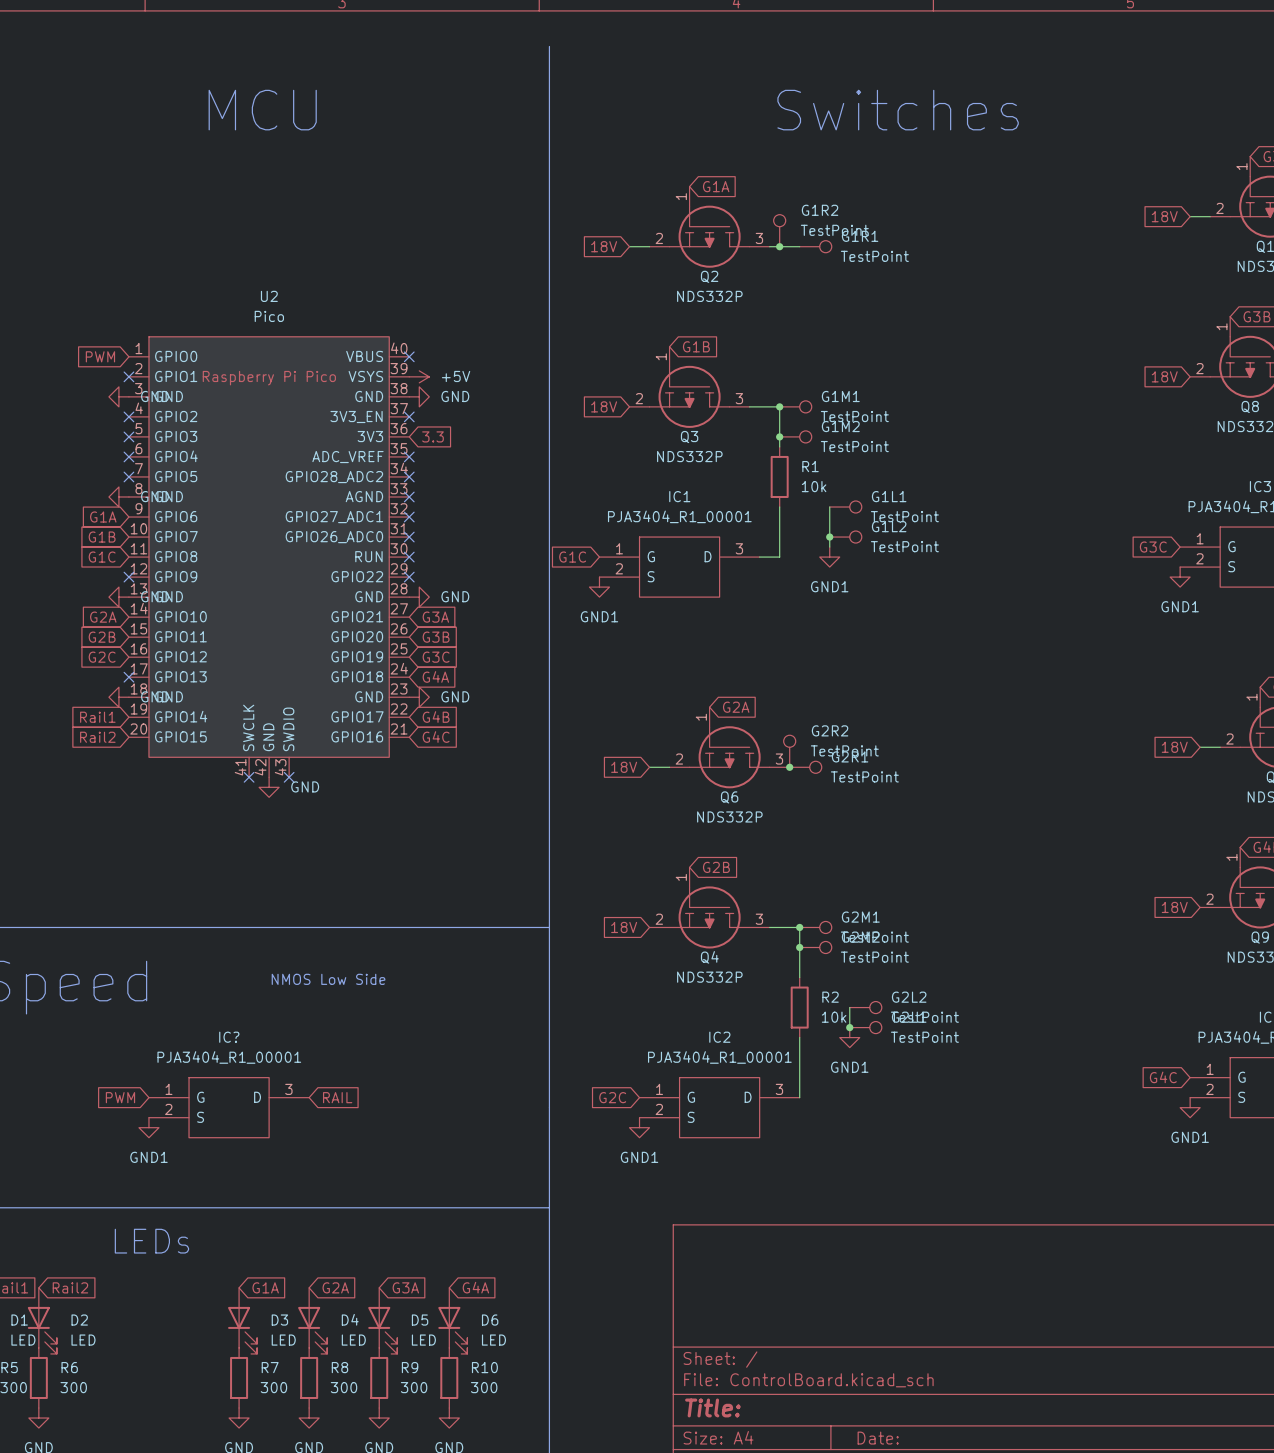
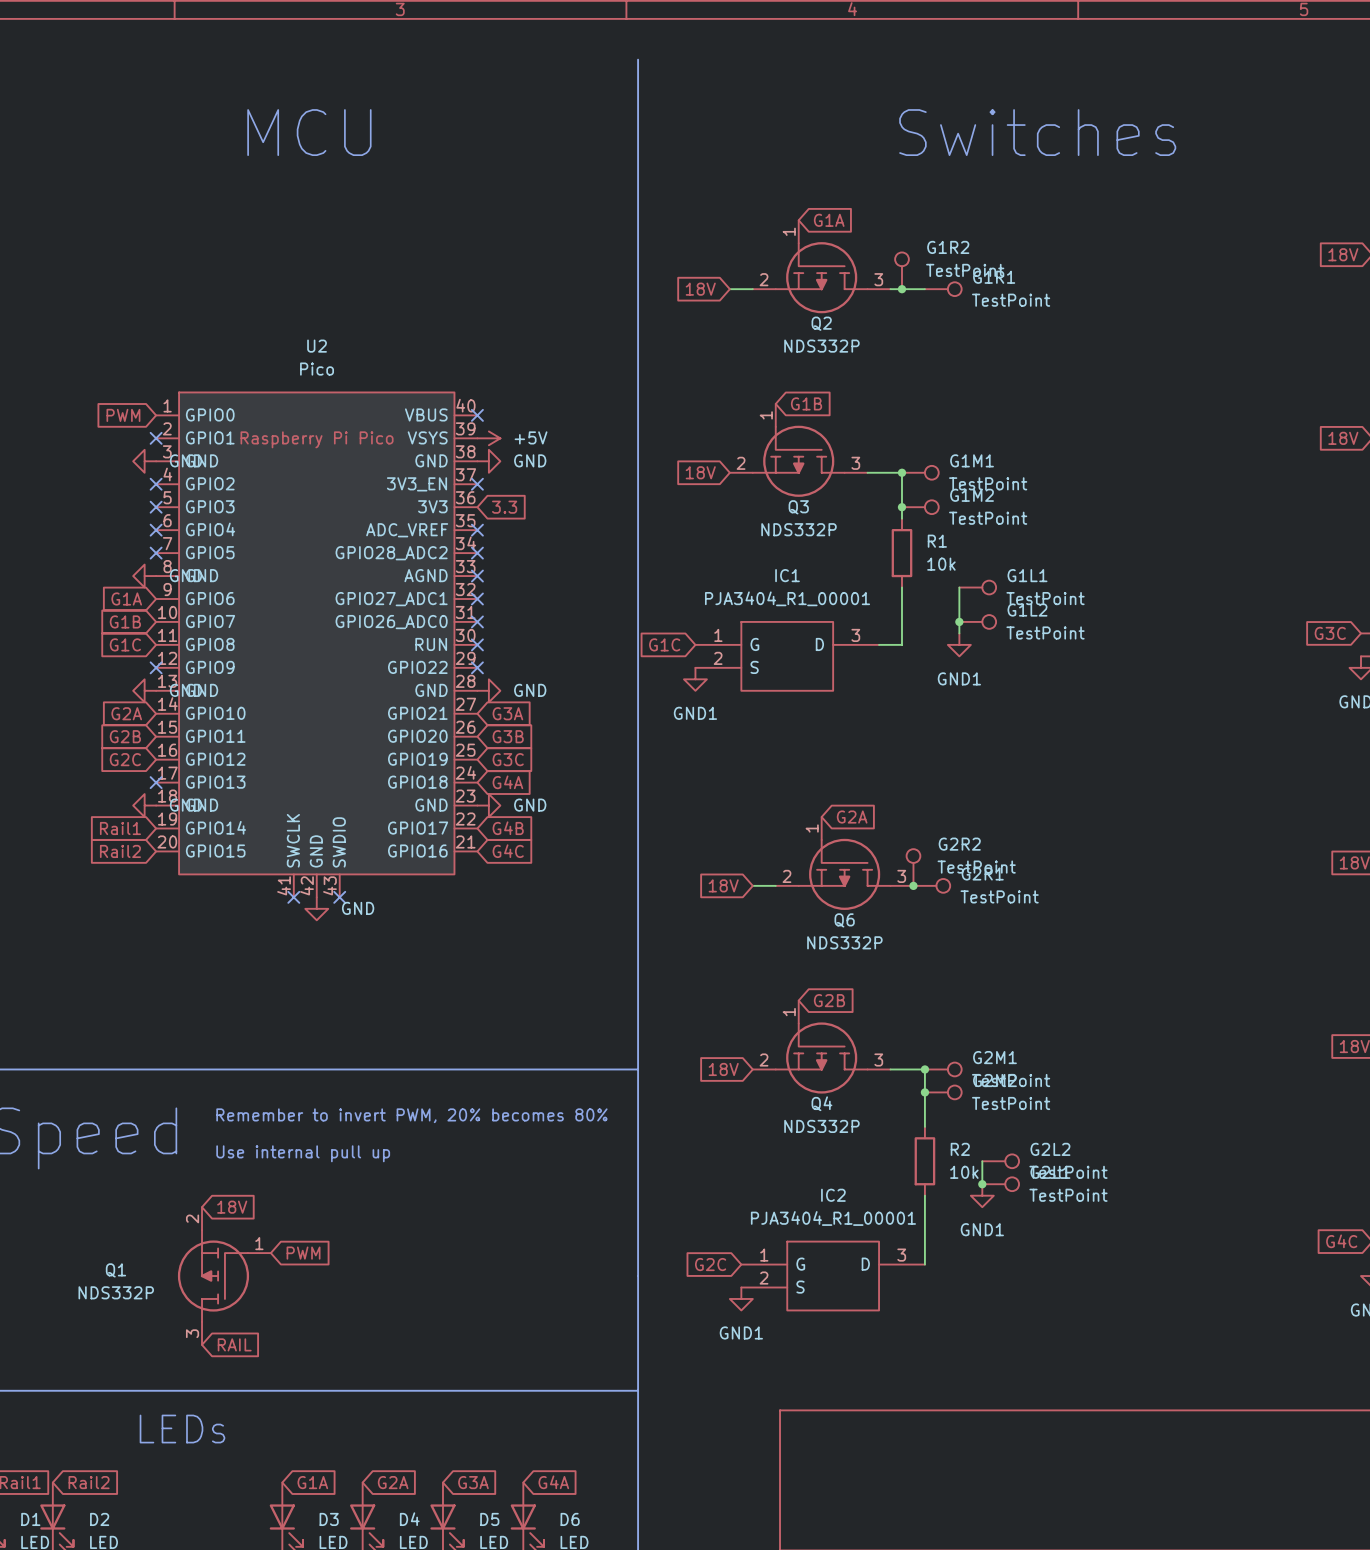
text: none -> Remember to invert PWM, 20% becomes 80% (411, 1115)
text: NMOS Low Side (328, 979) -> none
text: none -> Use internal pull up (303, 1153)
global label: none -> 18V (232, 1207)
global label rotation: 0° (120, 1097) -> 180° (303, 1253)
global label position: PWM (120, 1097) -> PWM (303, 1253)
global label position: RAIL (337, 1097) -> RAIL (234, 1344)
Q1: none -> NDS332P (224, 1276)
IC?: PJA3404_R1_00001 (229, 1107) -> none
power symbol: GND1 (148, 1127) -> none

